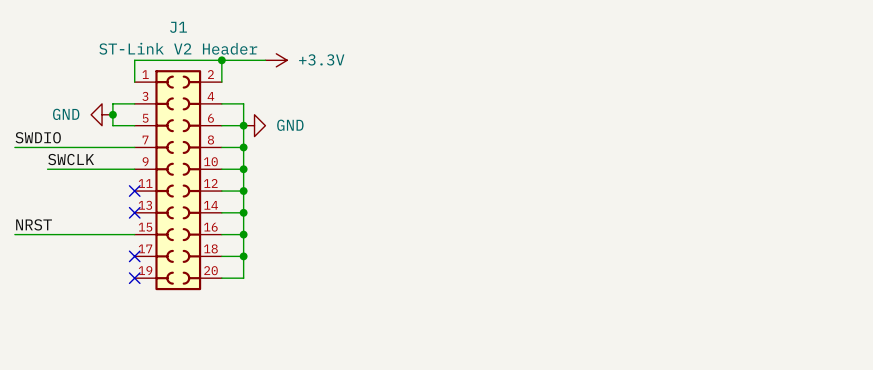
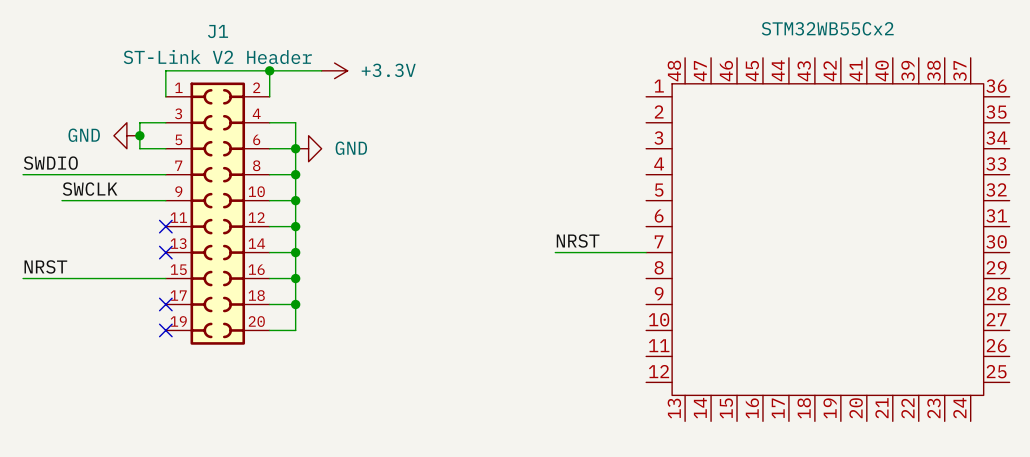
STM32WB55Cx2: none -> (827, 239)
label: none -> NRST (578, 240)
wire: none -> (555, 252) (646, 252)

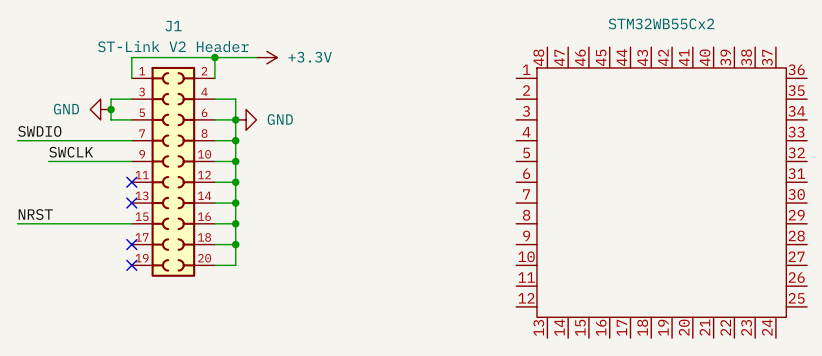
label: NRST (578, 240) -> none
wire: (555, 252) (646, 252) -> none

